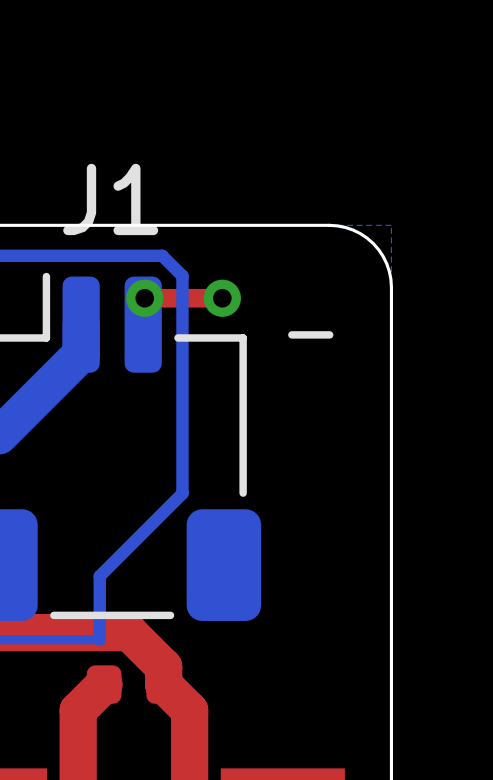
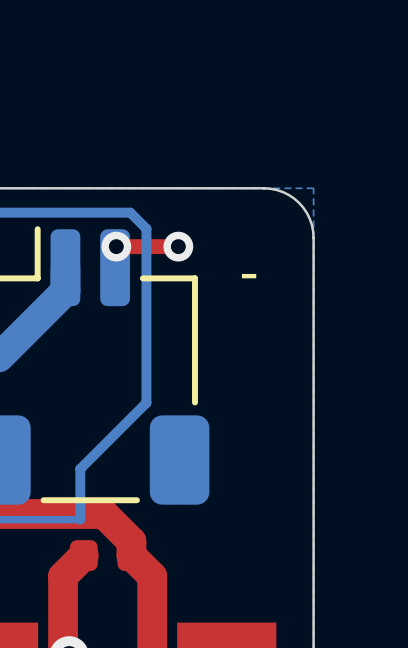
J1 name: J1 (110, 199) -> none

